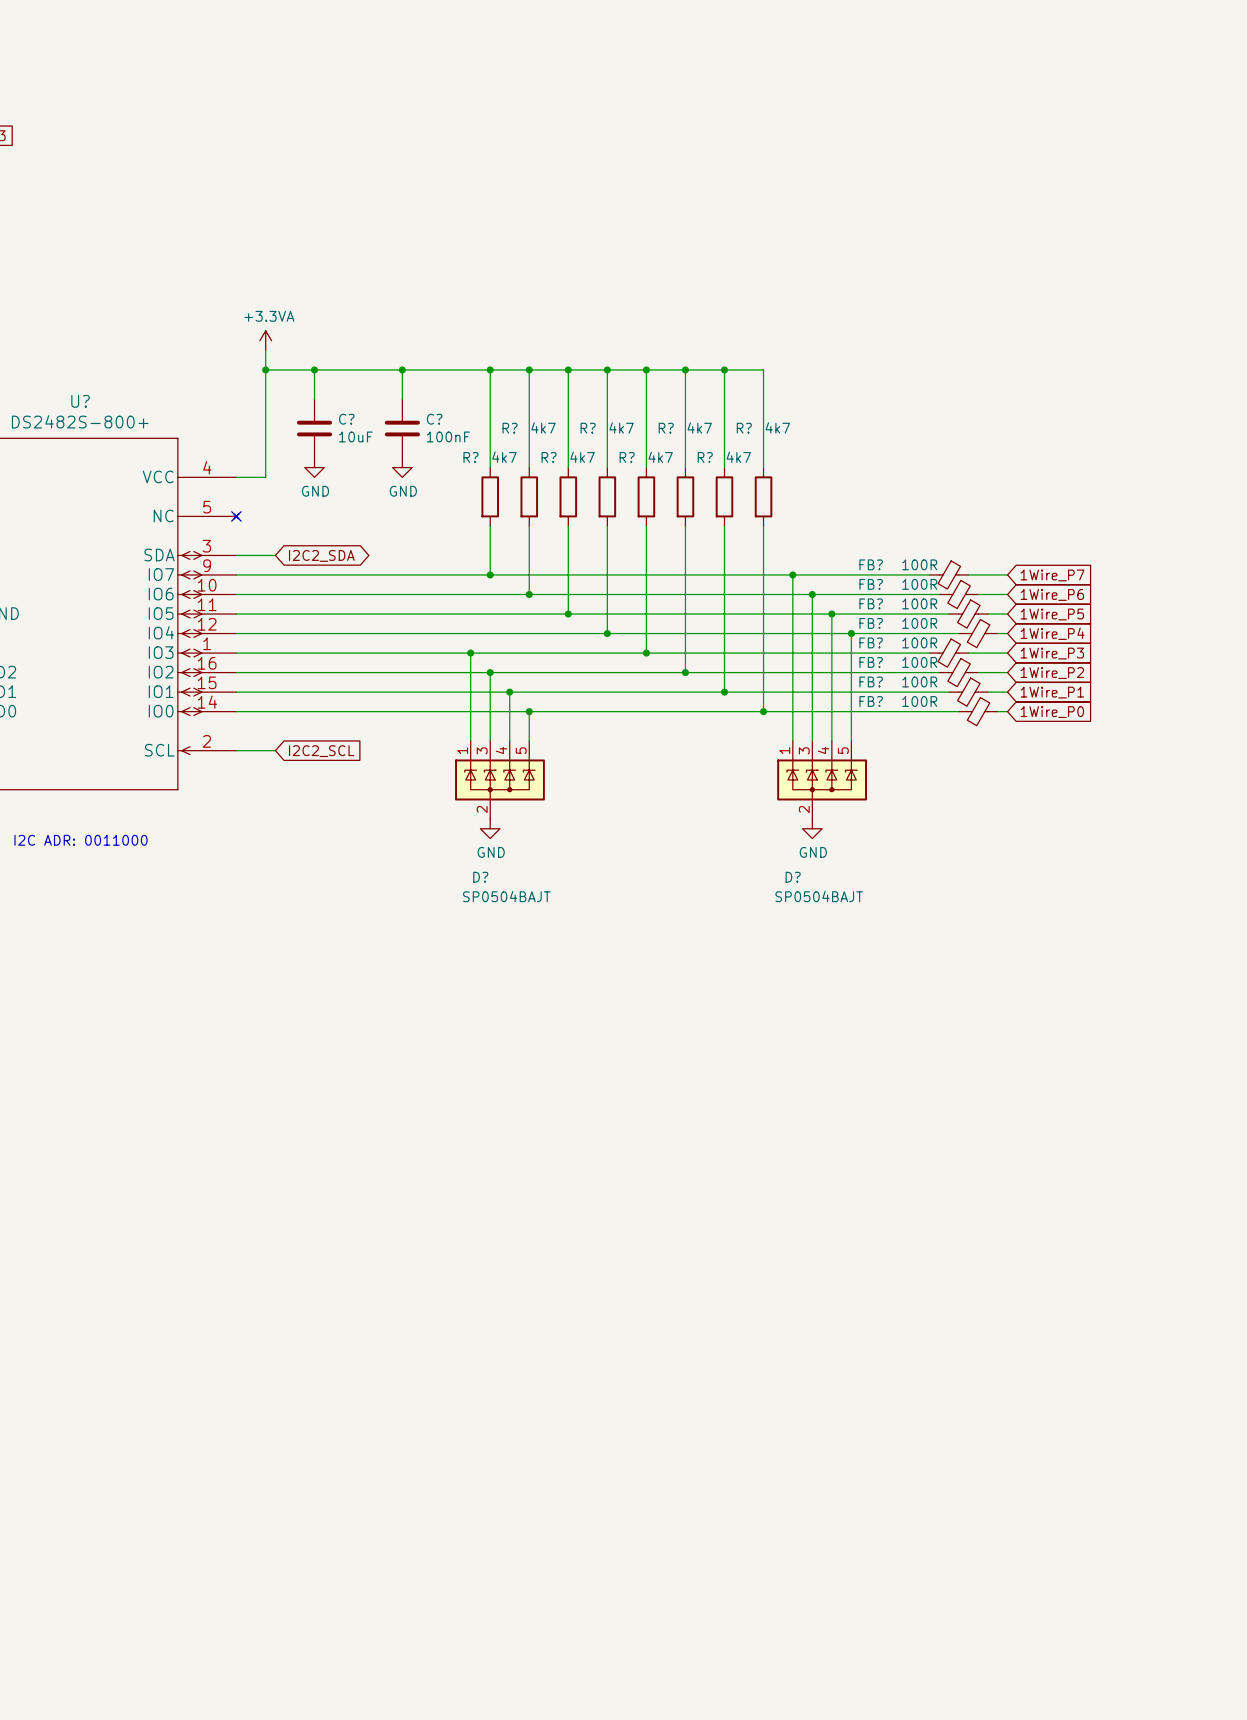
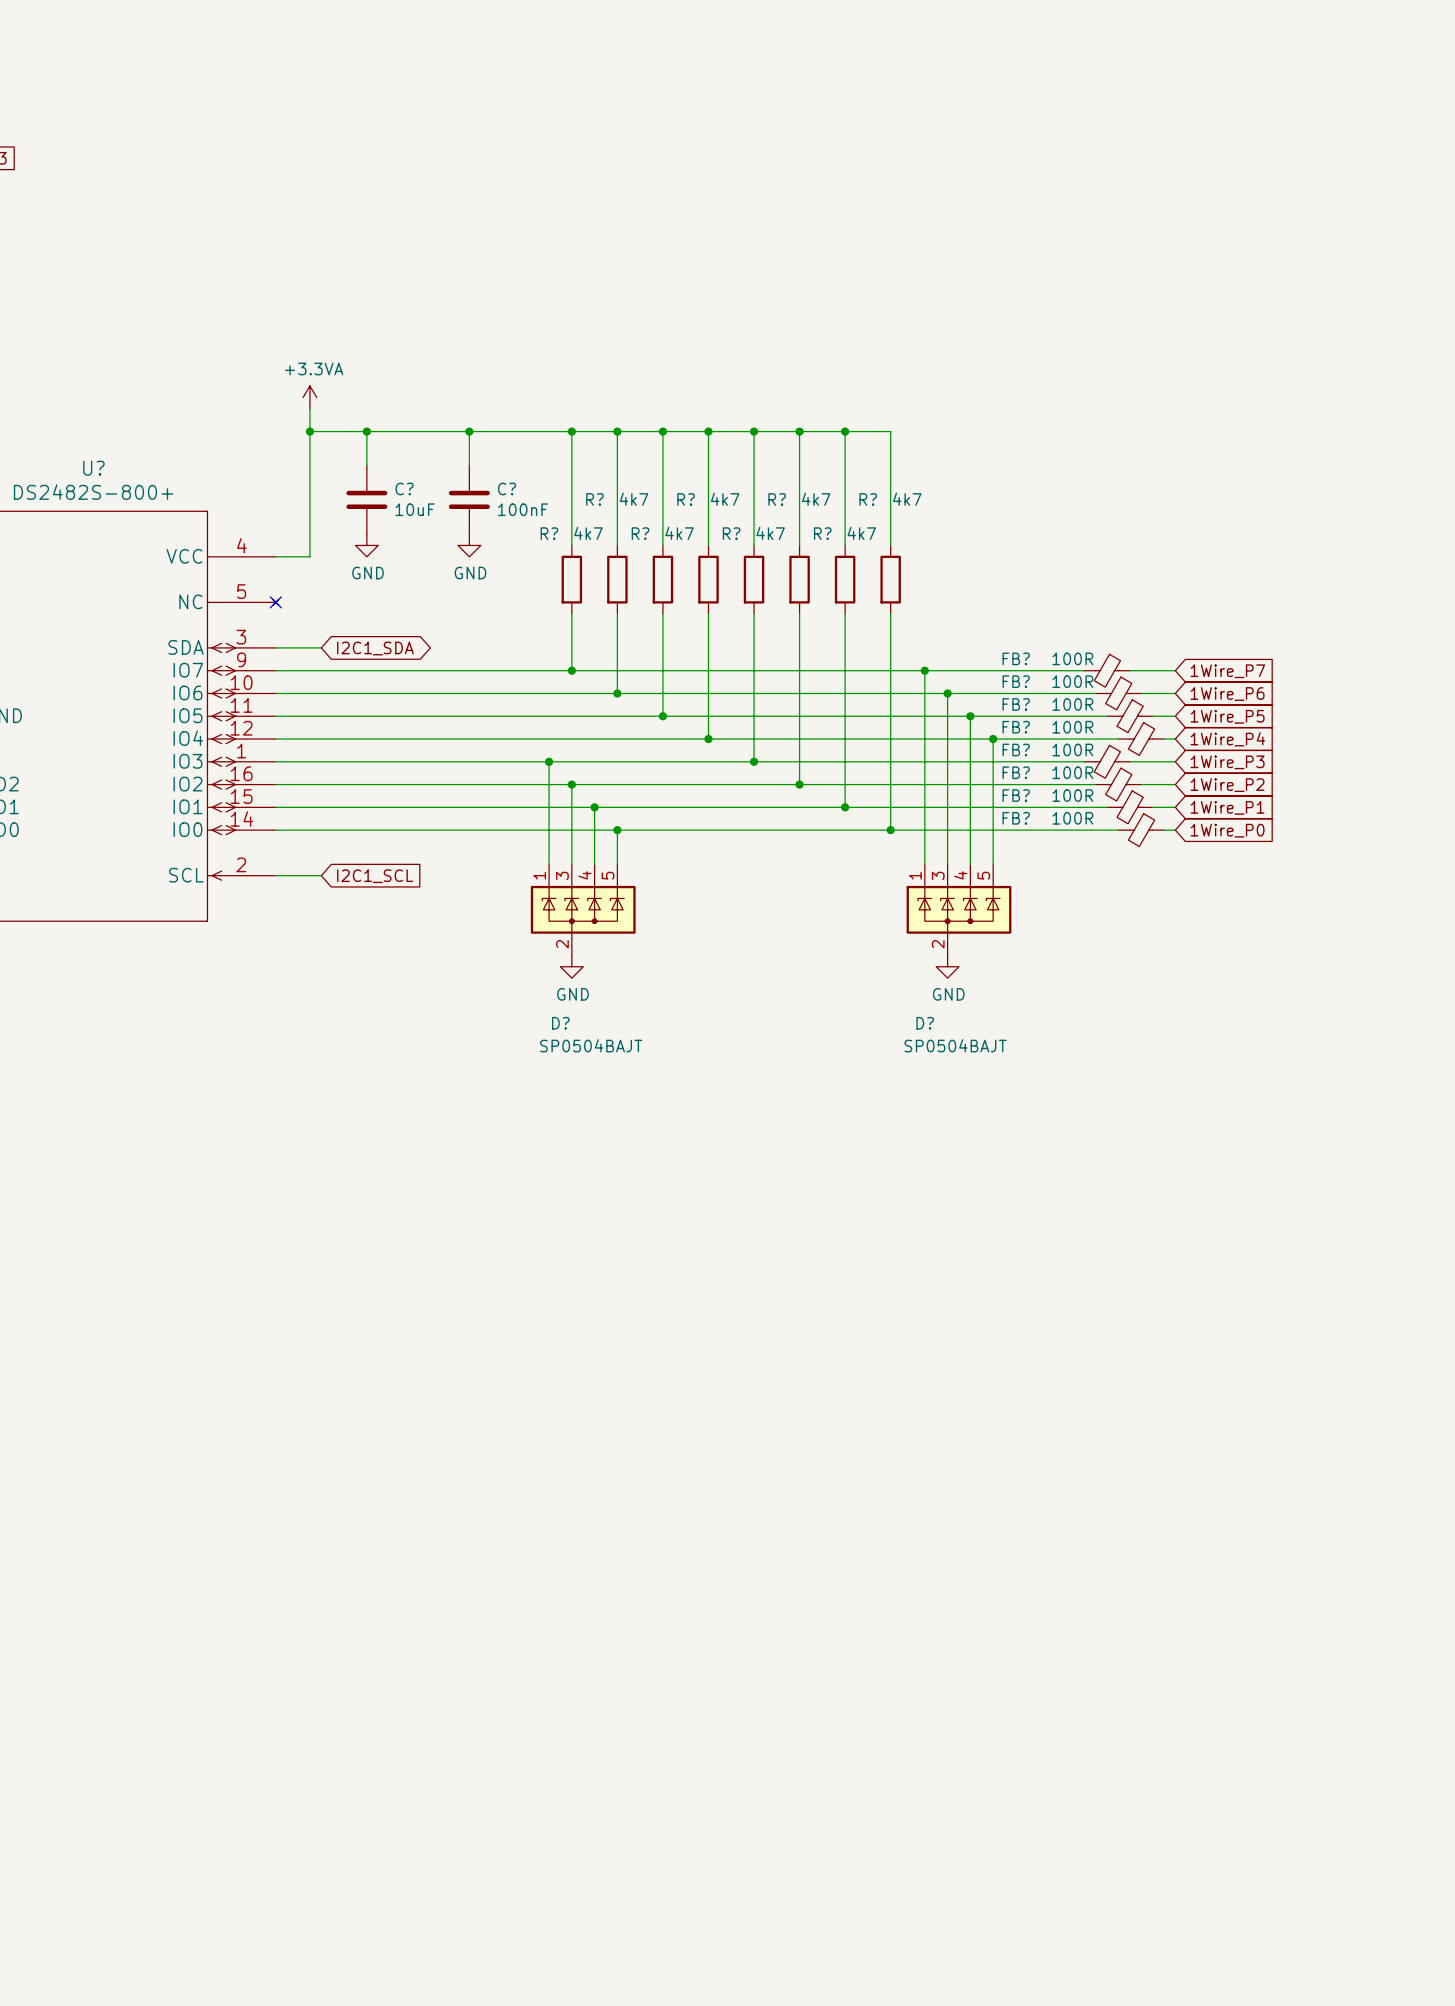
global label: I2C2_SDA (321, 555) -> I2C1_SDA (375, 648)
global label: I2C2_SCL (321, 751) -> I2C1_SCL (375, 876)
text: I2C ADR: 0011000 (81, 840) -> none

